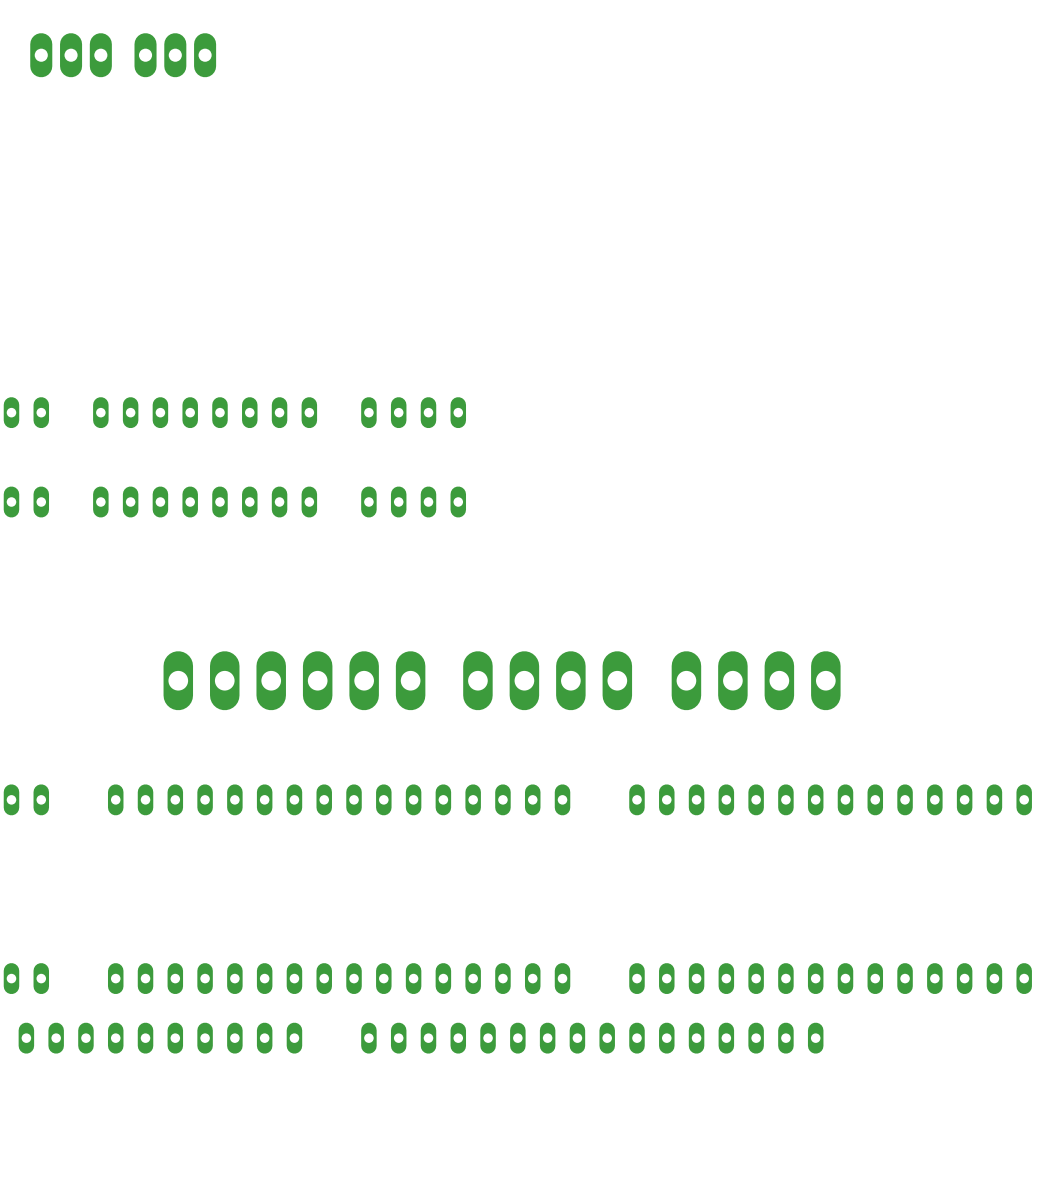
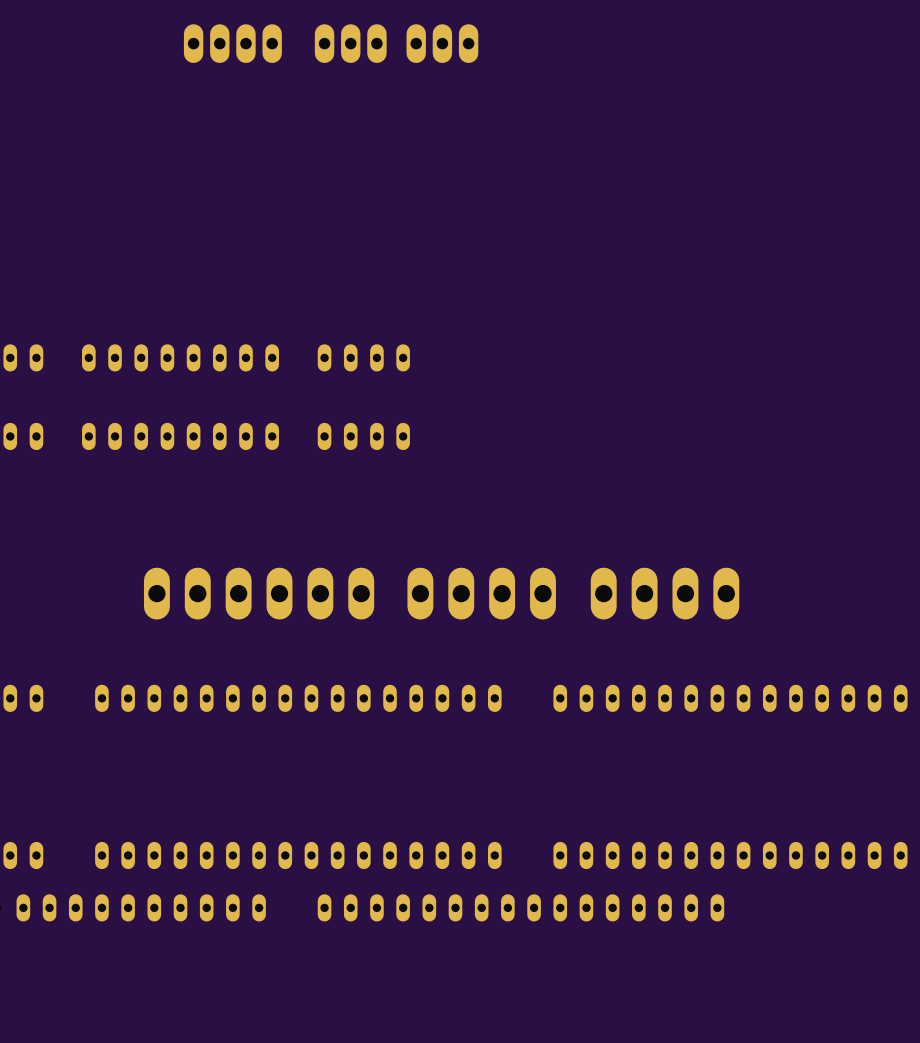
part: (71, 55) -> none
part: (175, 55) -> none
part: none -> (232, 43)
part: none -> (350, 43)
part: none -> (442, 43)

